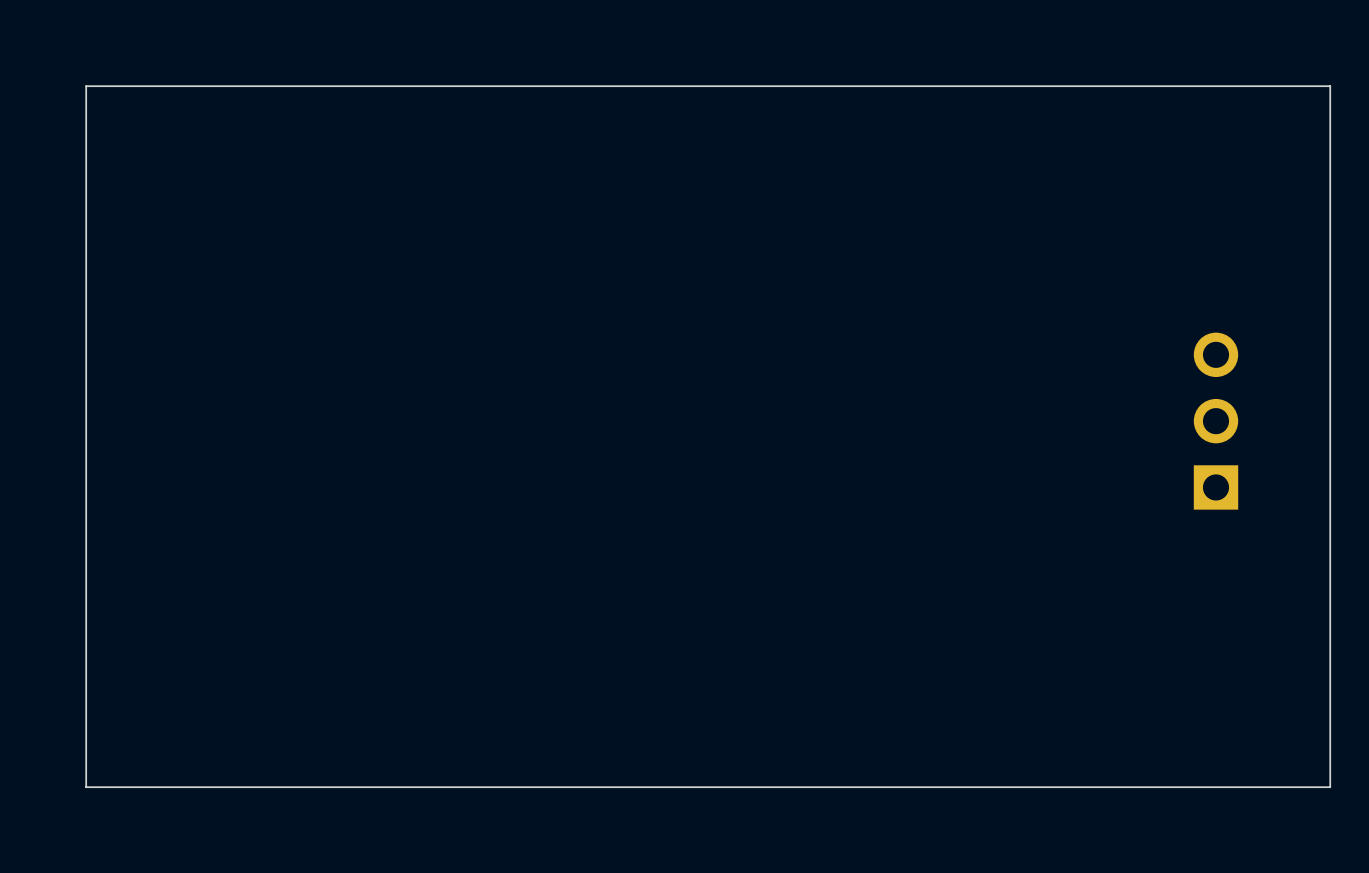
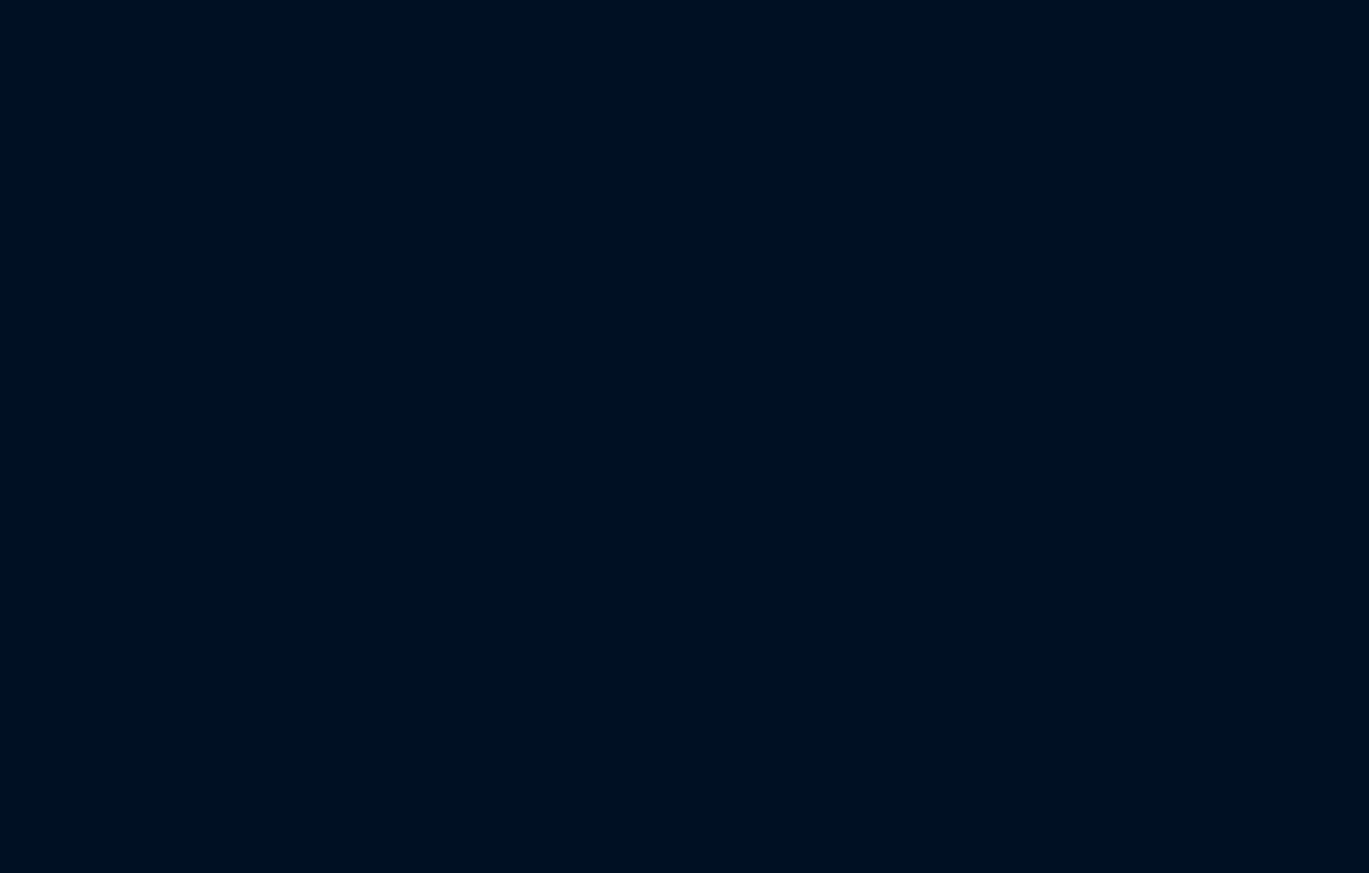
board edge: (1330, 86) (86, 86) (86, 787) (1330, 787) (1330, 86) -> none
part: (1216, 421) -> none

